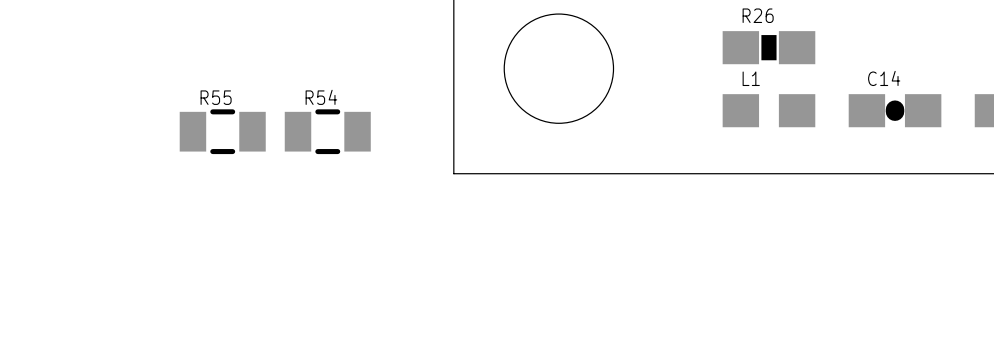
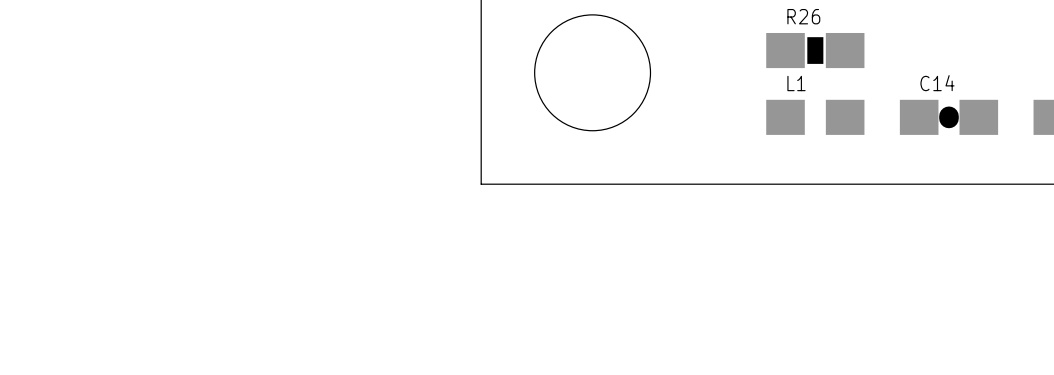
R55: (222, 131) -> none
R54: (327, 131) -> none

